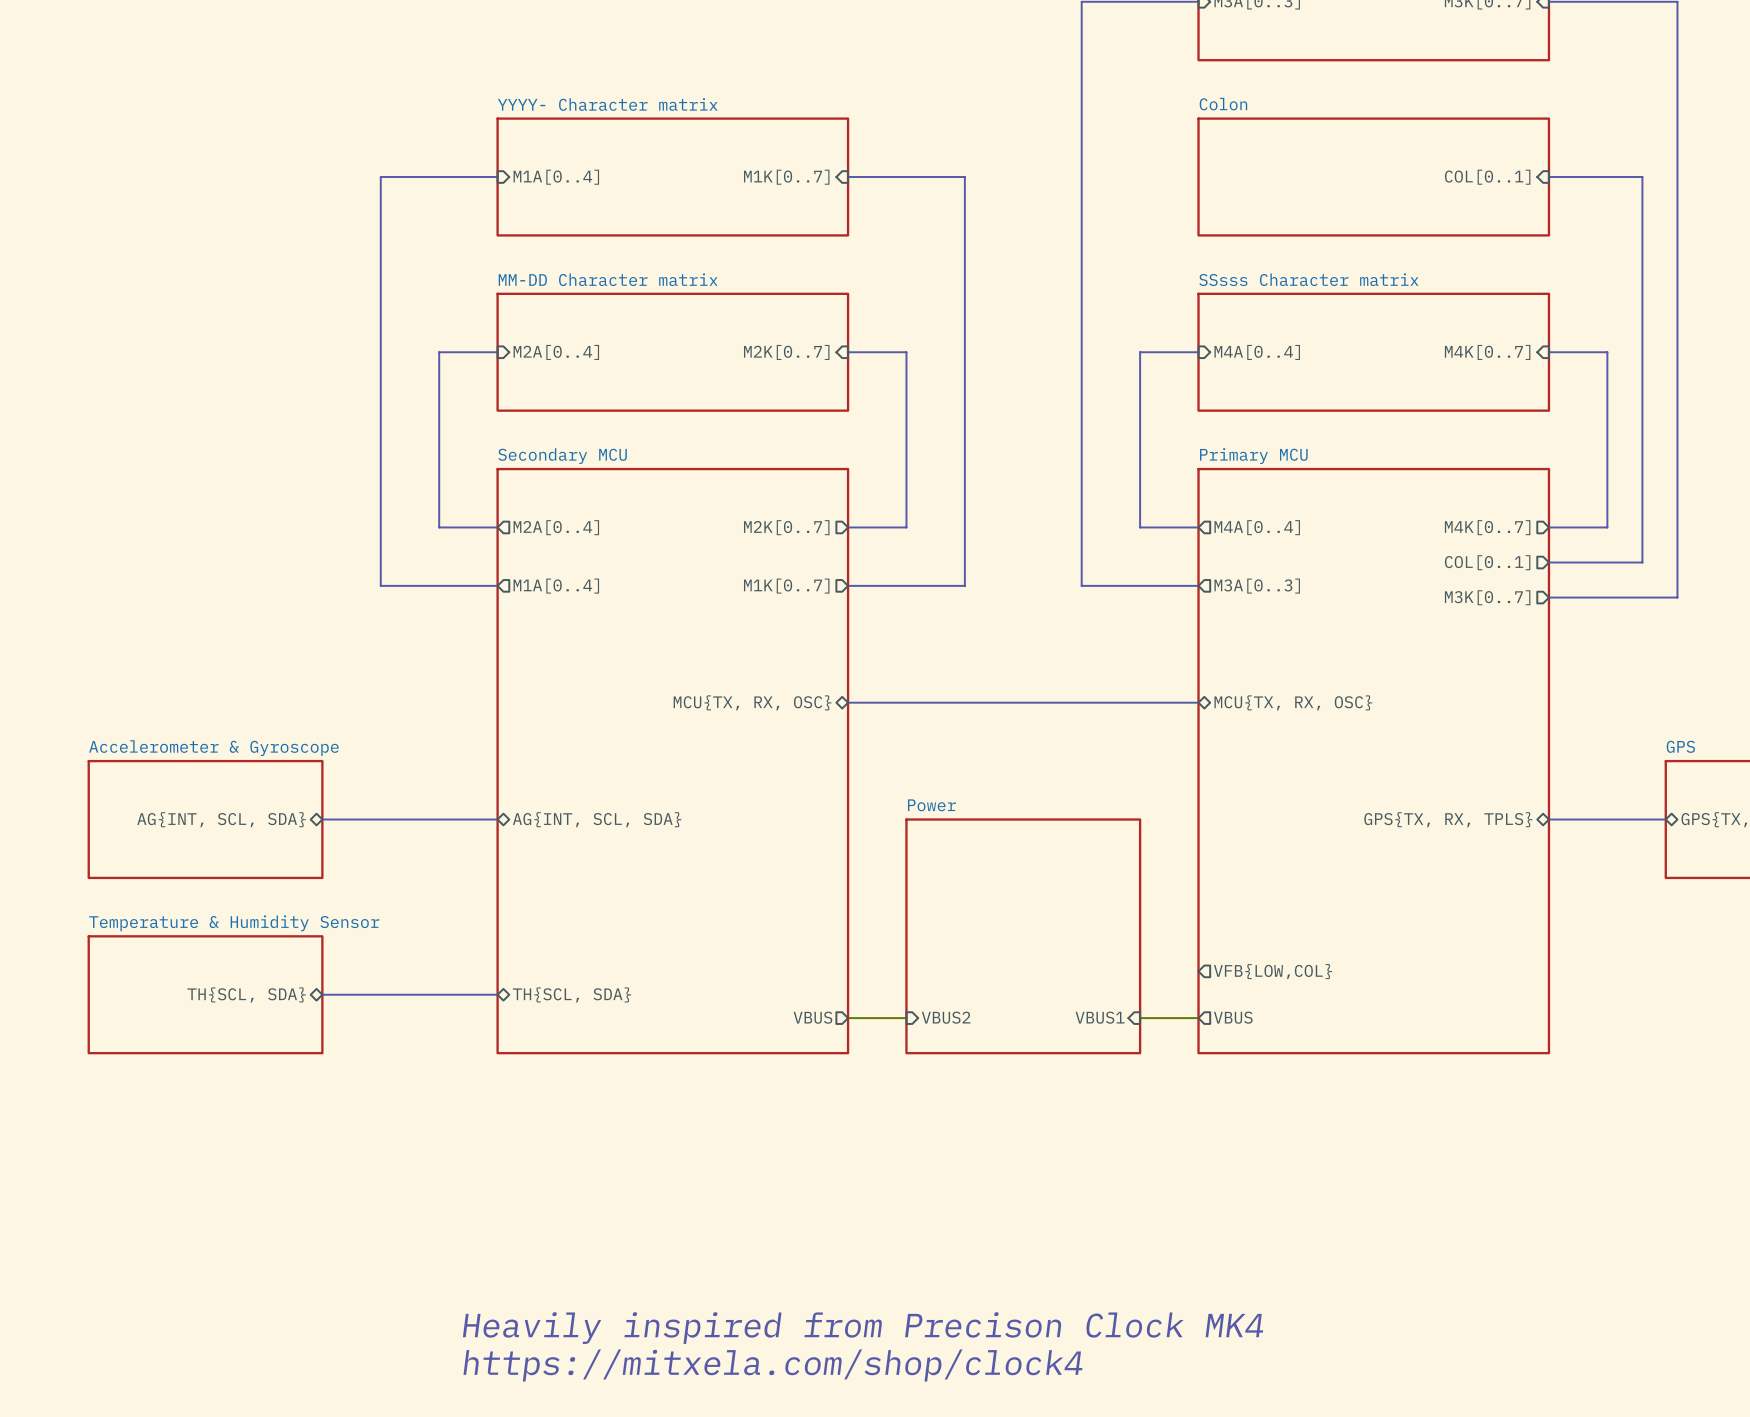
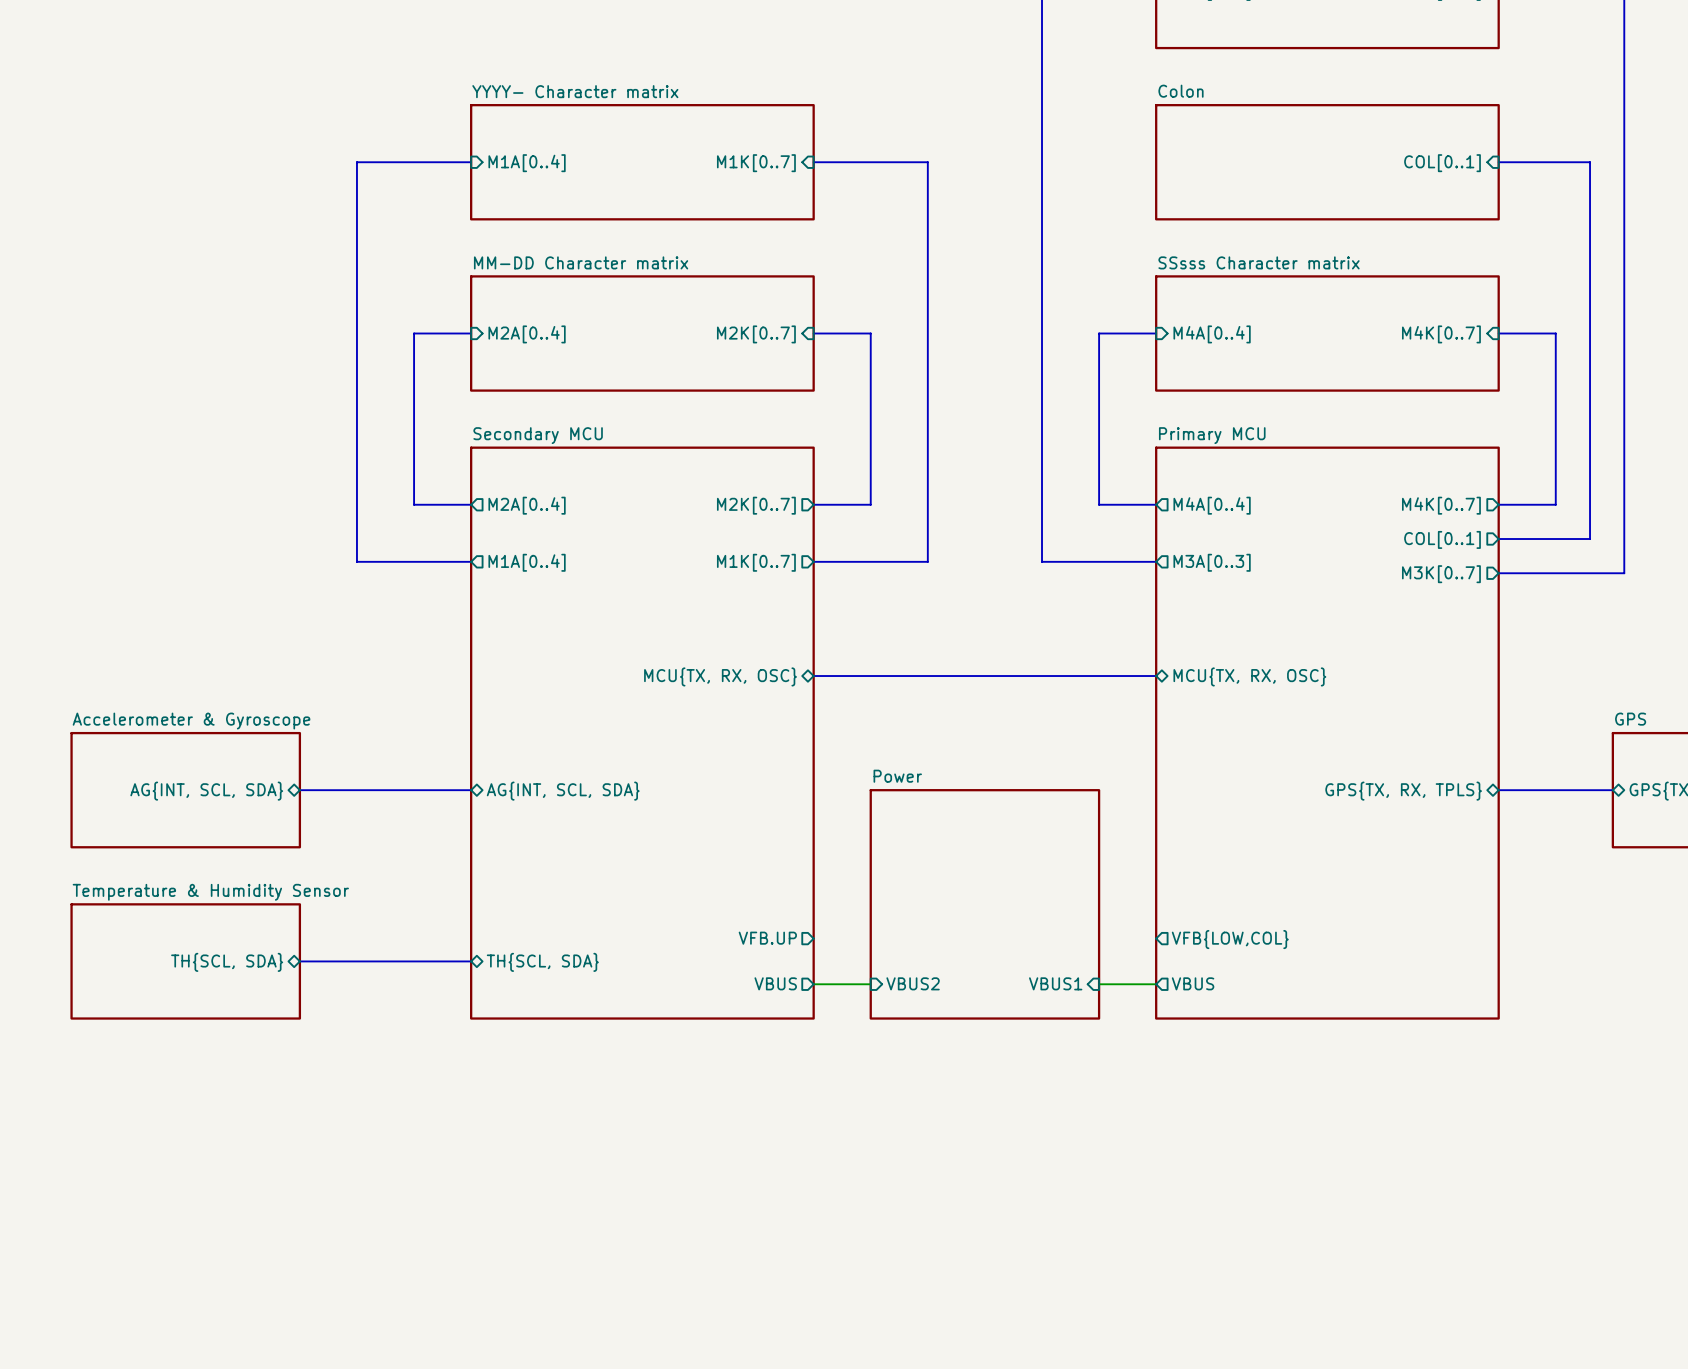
sheet pin: none -> VFB.UP (767, 938)
text: Heavily inspired from Precison Clock MK4 (863, 1328) -> none
text: https://mitxela.com/shop/clock4 (772, 1365) -> none

